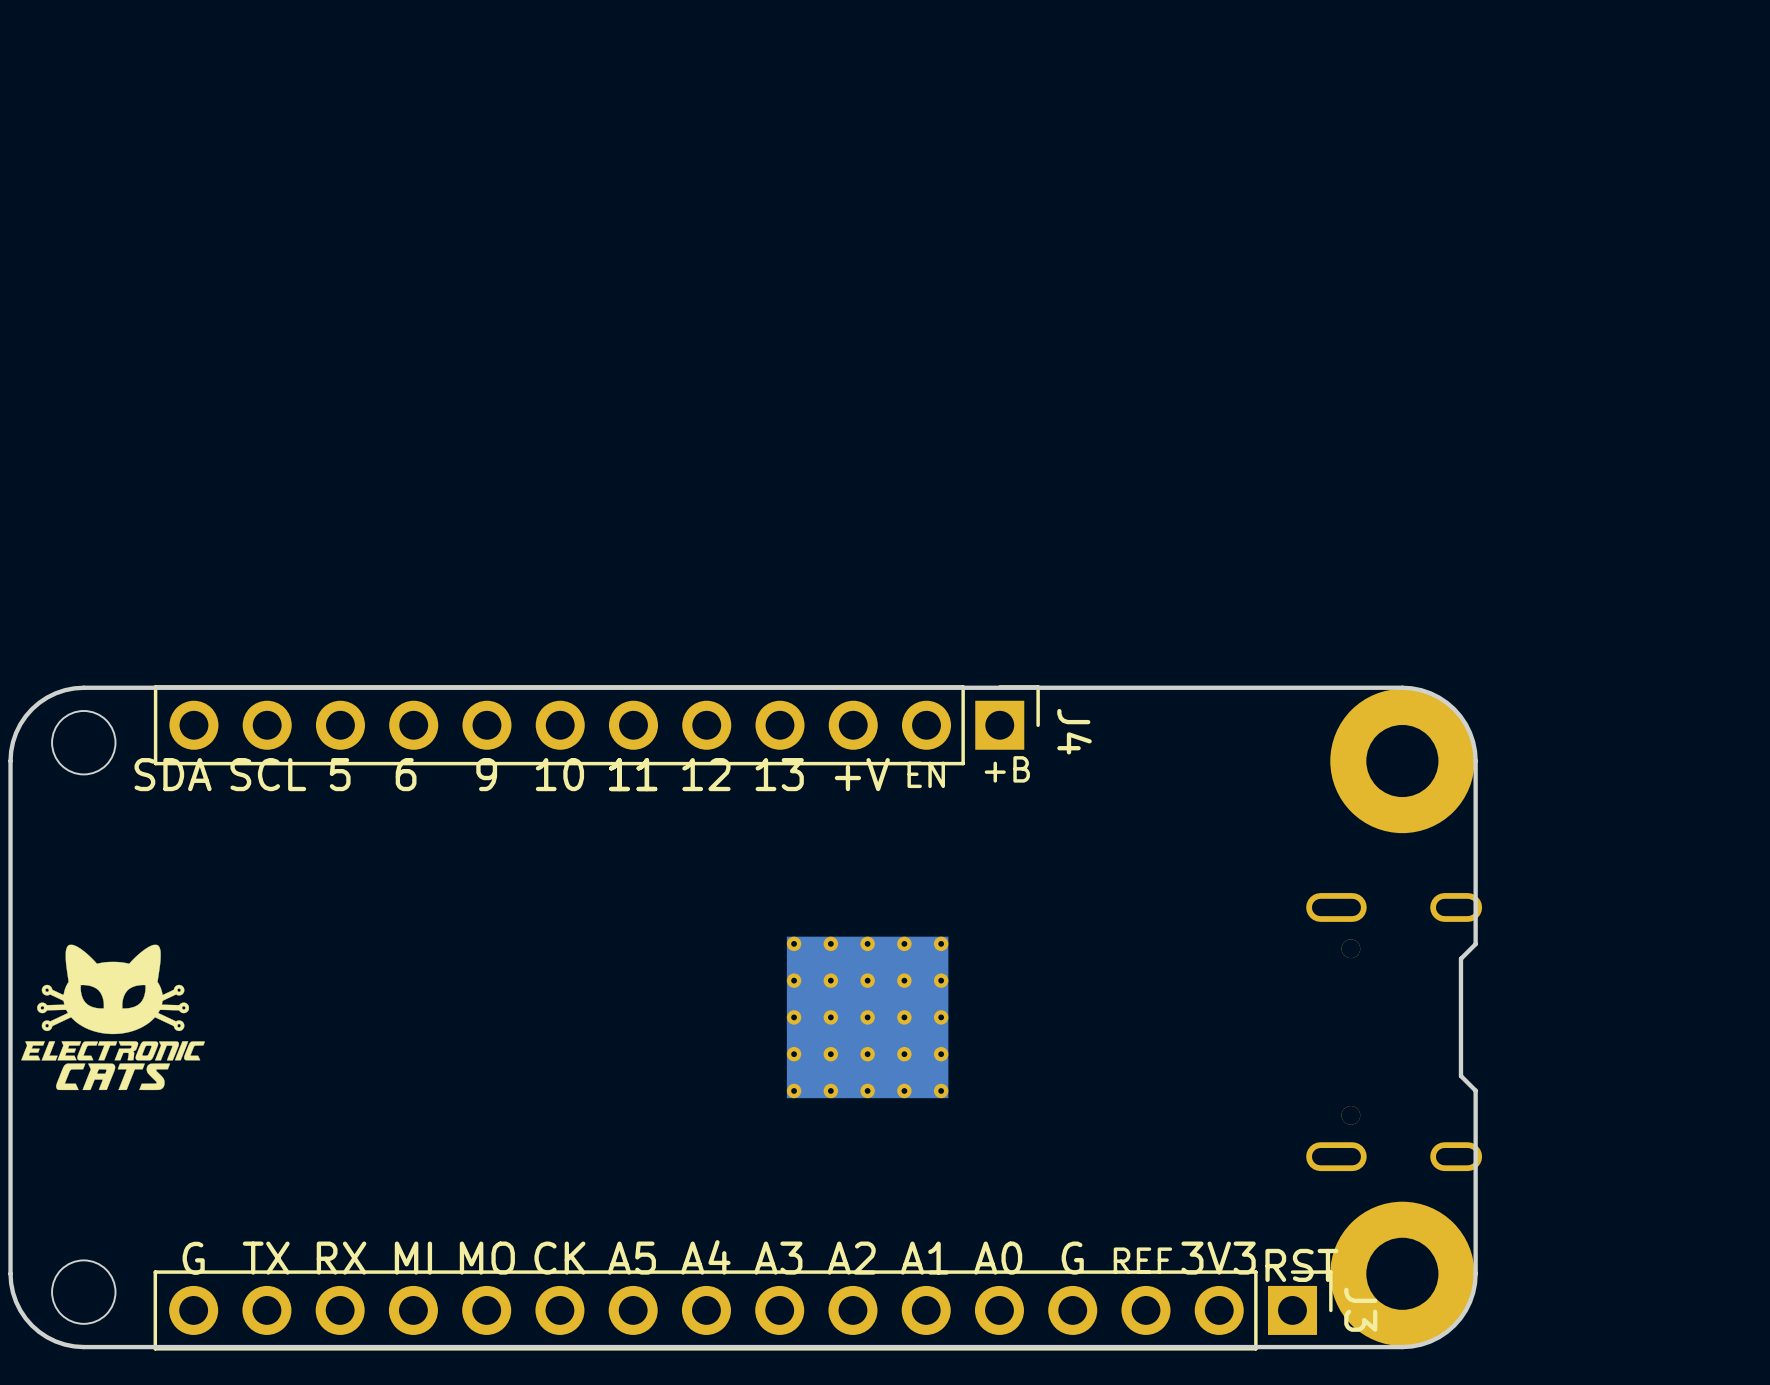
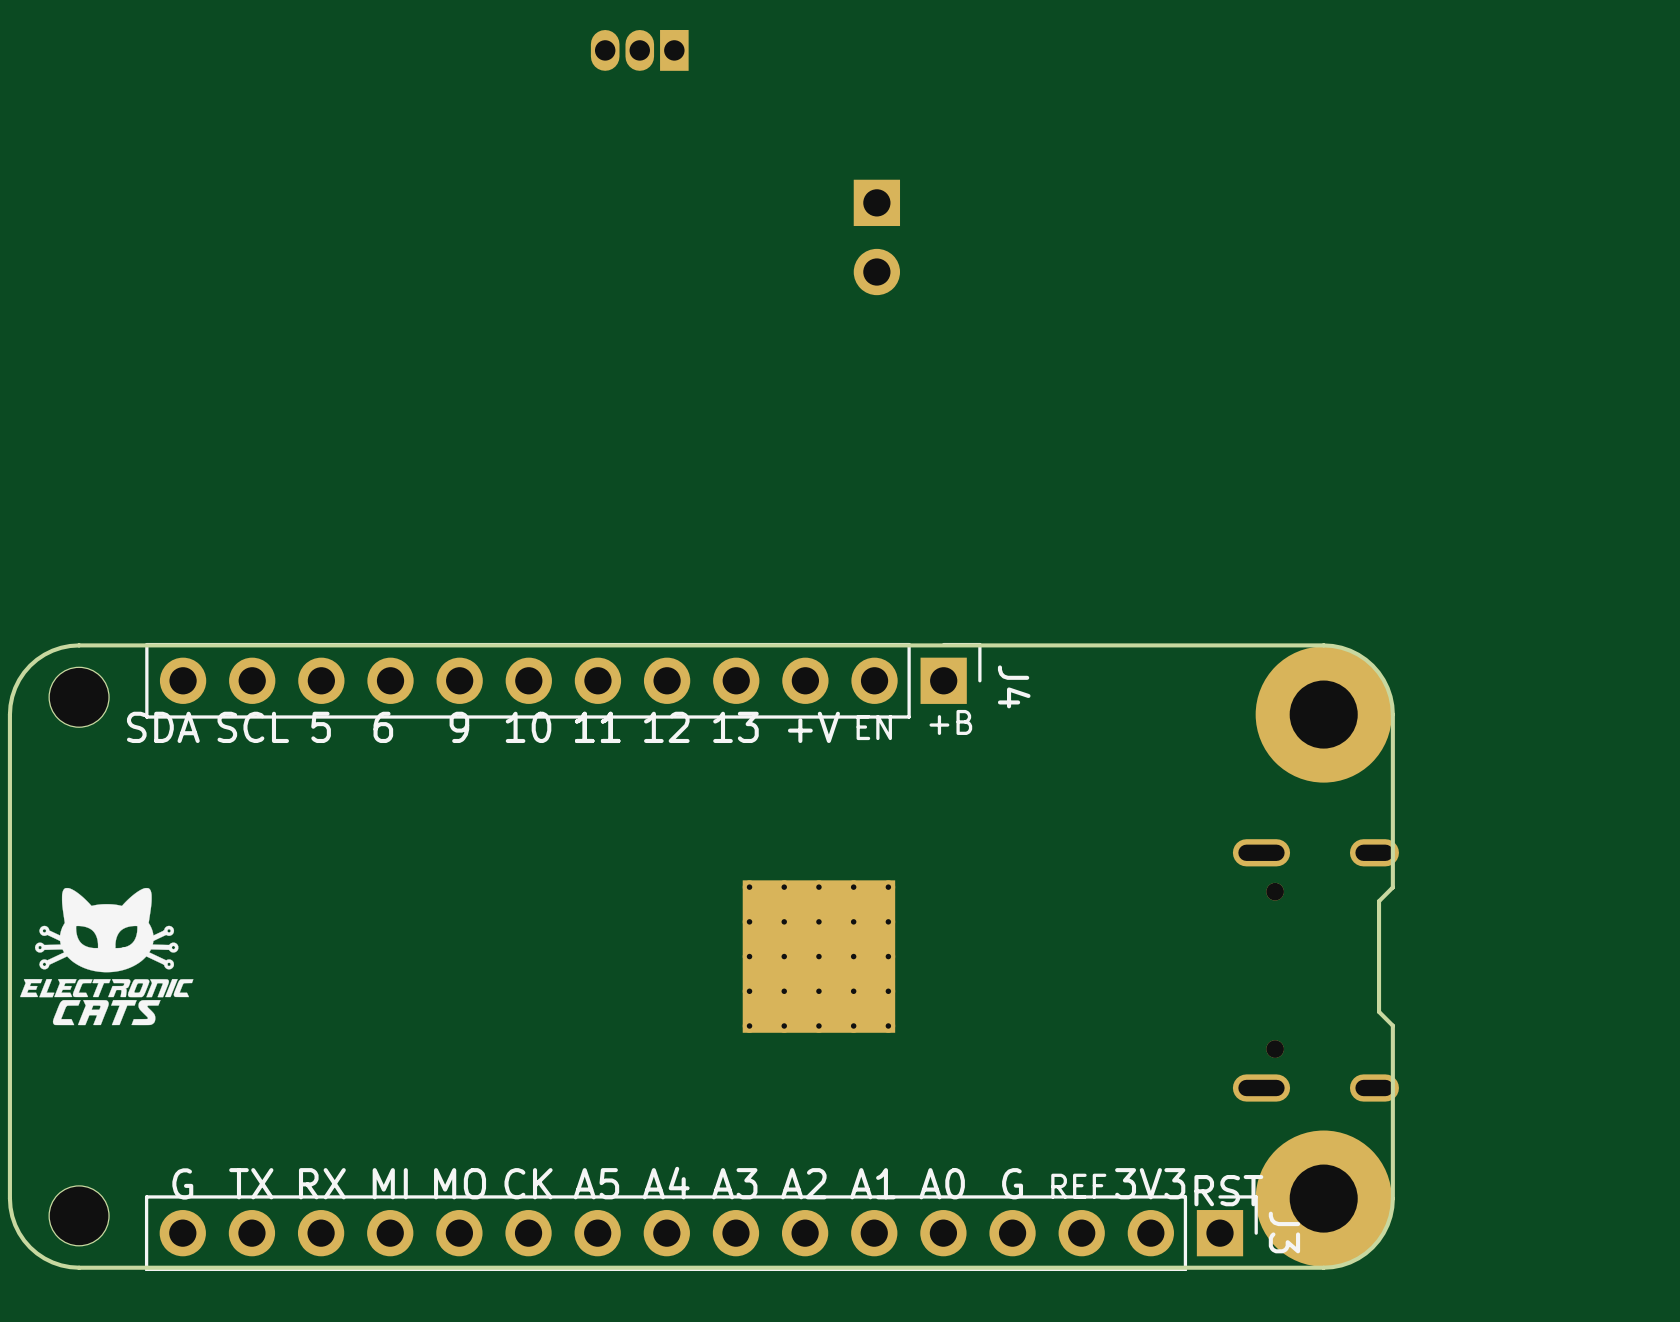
part: none -> (639, 50)
part: none -> (876, 237)

